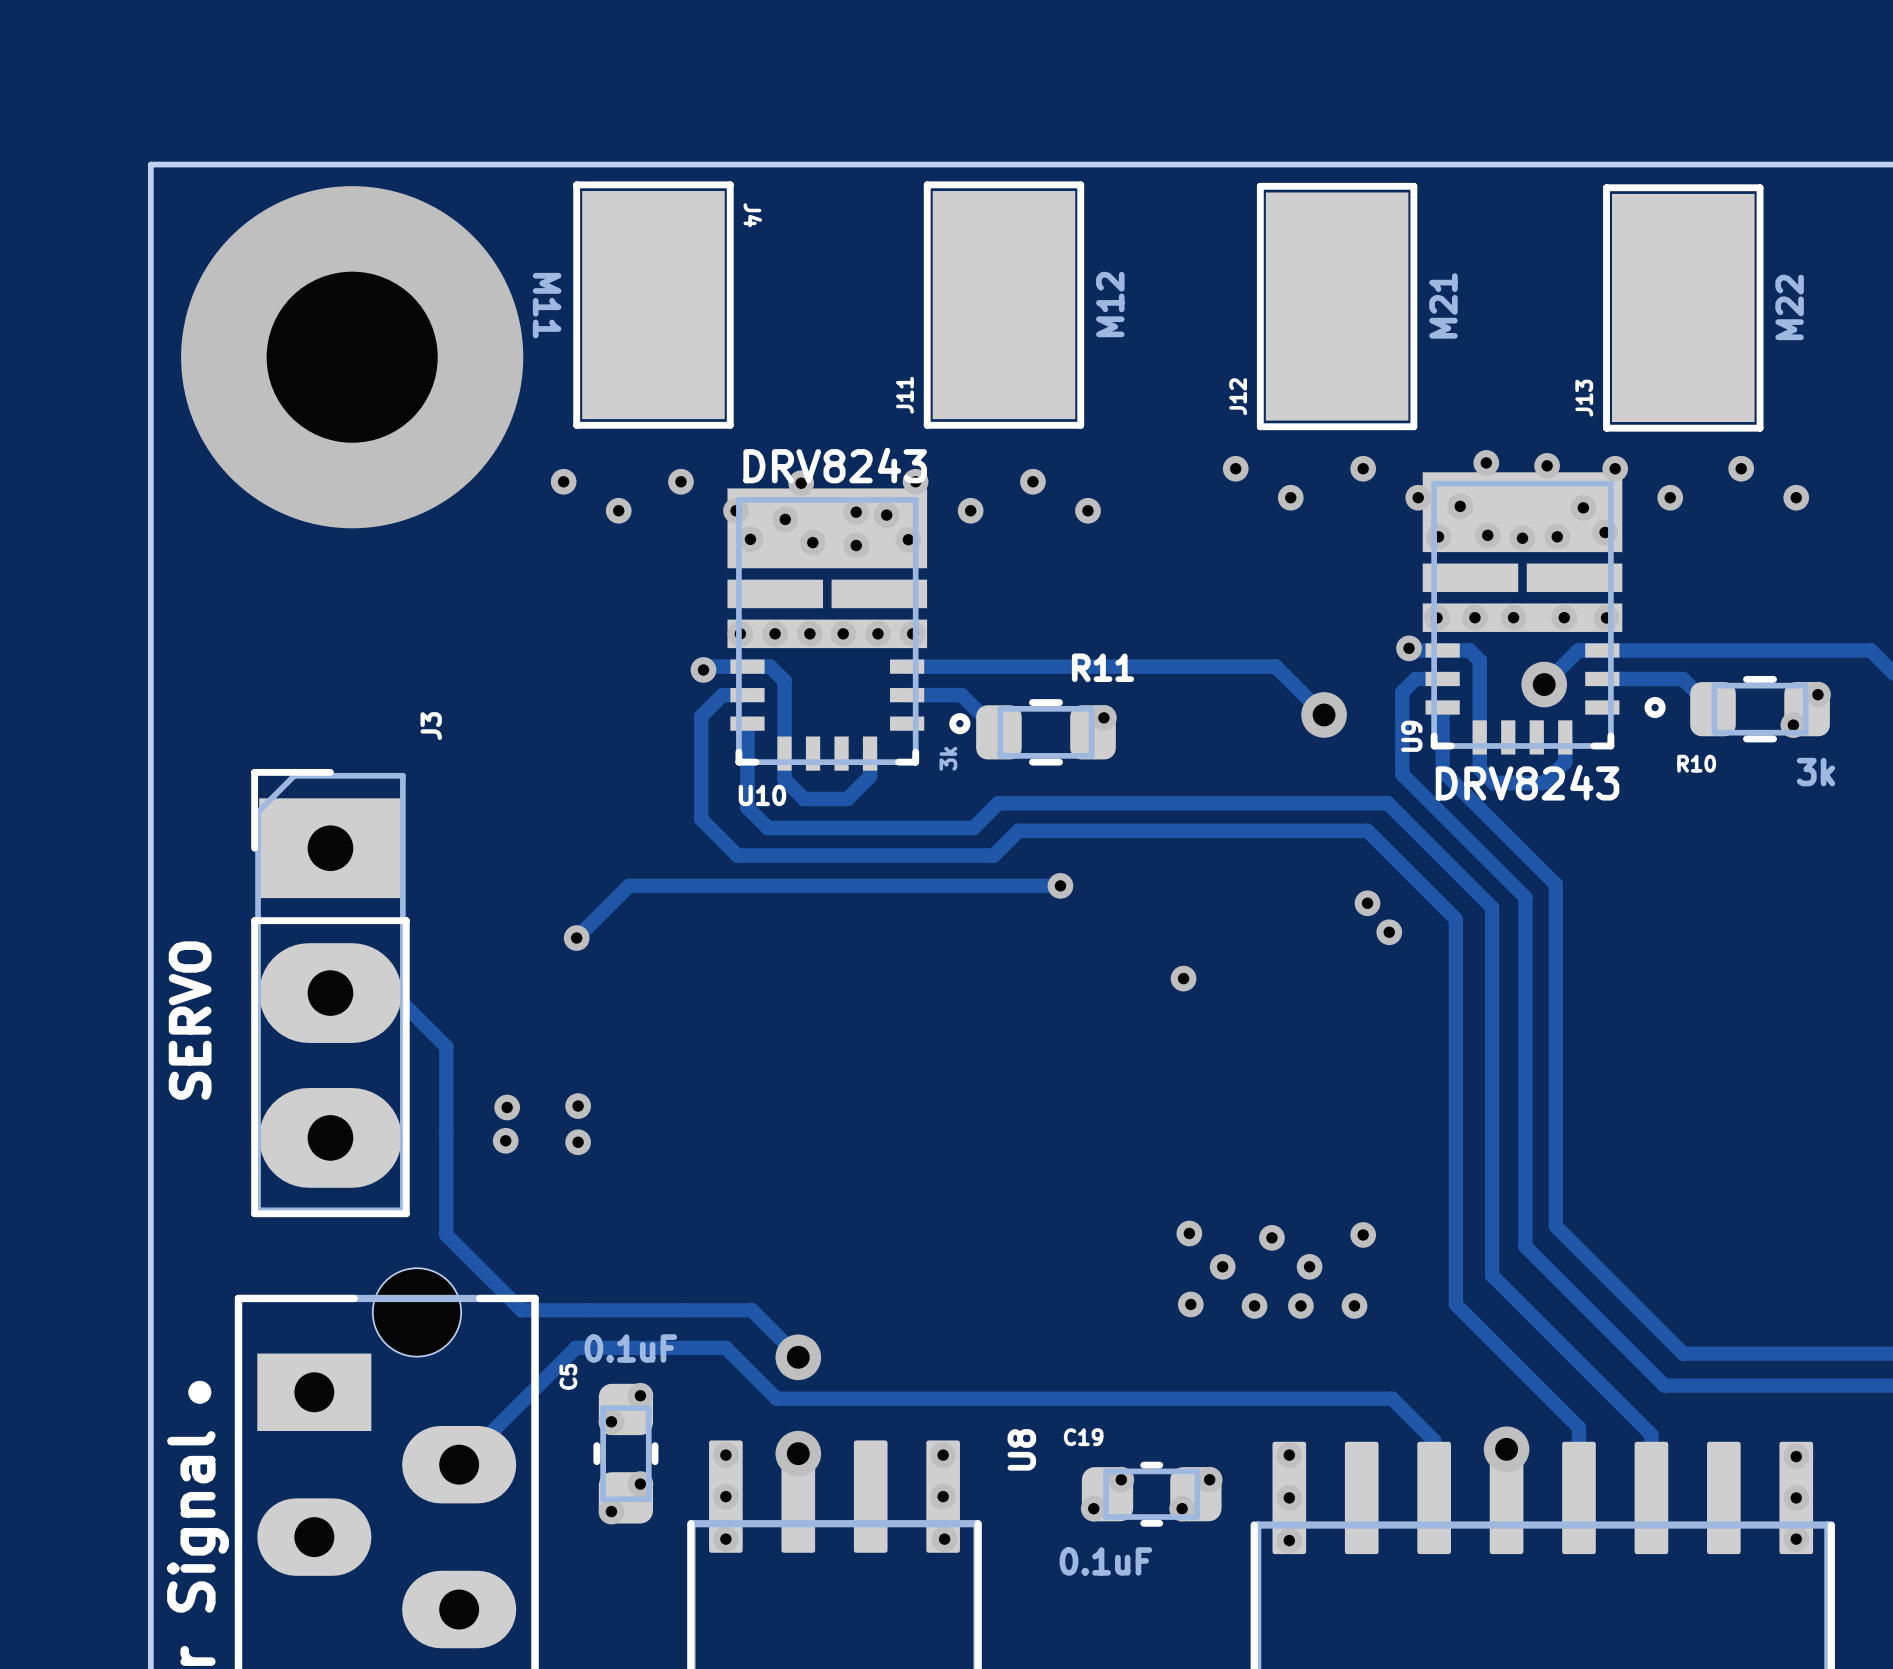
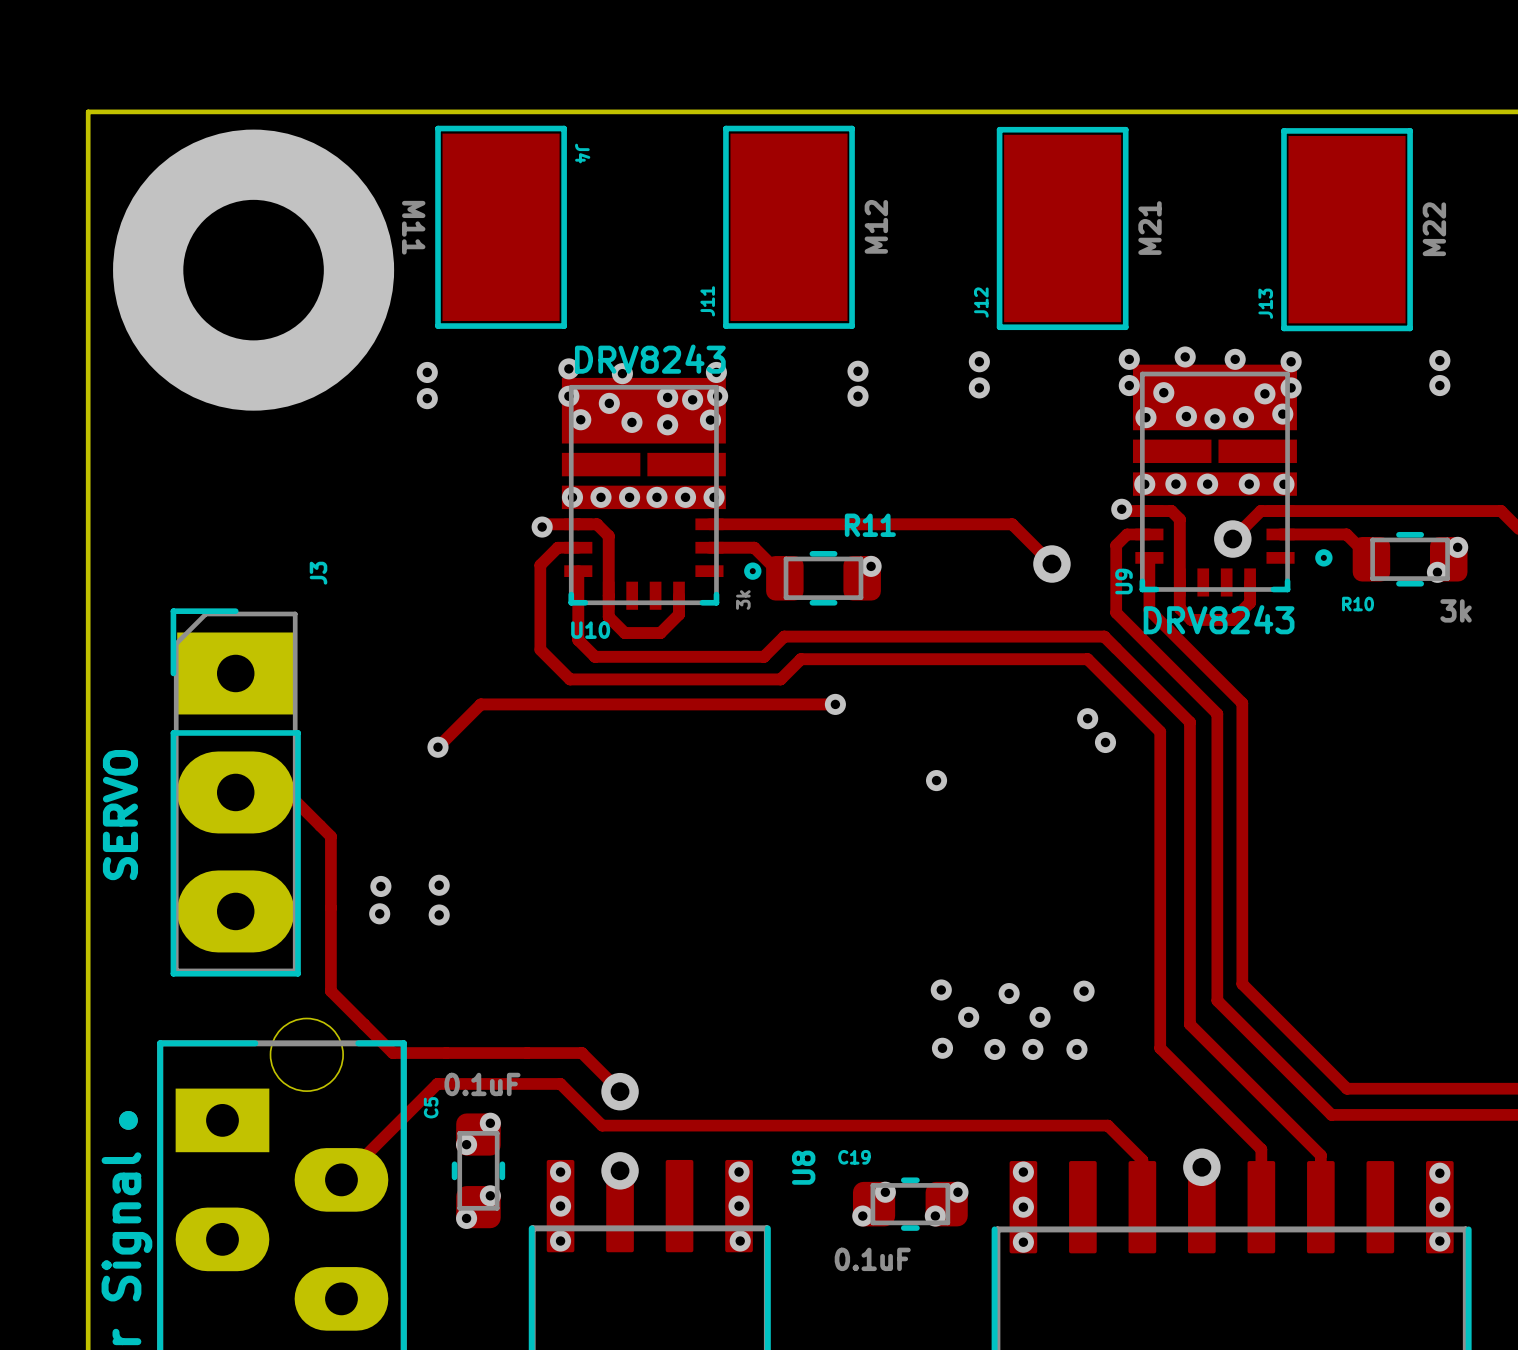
via position: (1363, 468) -> (1129, 359)
via position: (1741, 468) -> (1439, 360)
via position: (680, 481) -> (568, 368)
via position: (1032, 481) -> (858, 371)
via position: (1290, 497) -> (979, 387)
via position: (1670, 497) -> (1291, 387)
via position: (618, 510) -> (427, 398)
via position: (970, 510) -> (717, 396)

